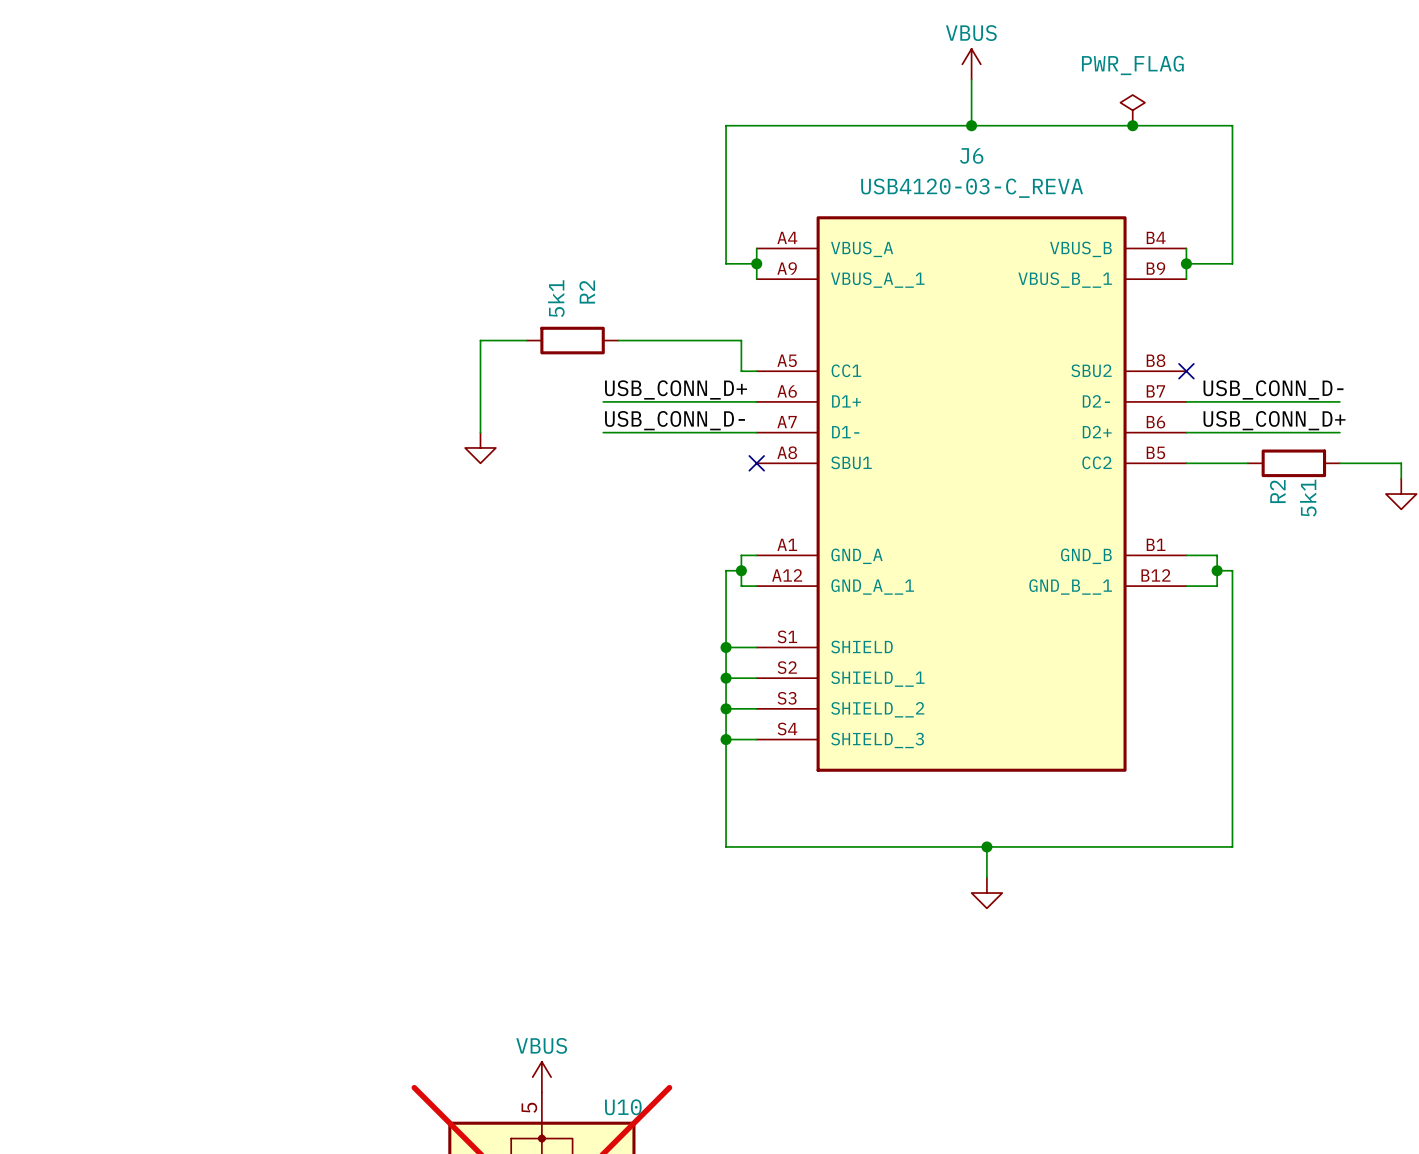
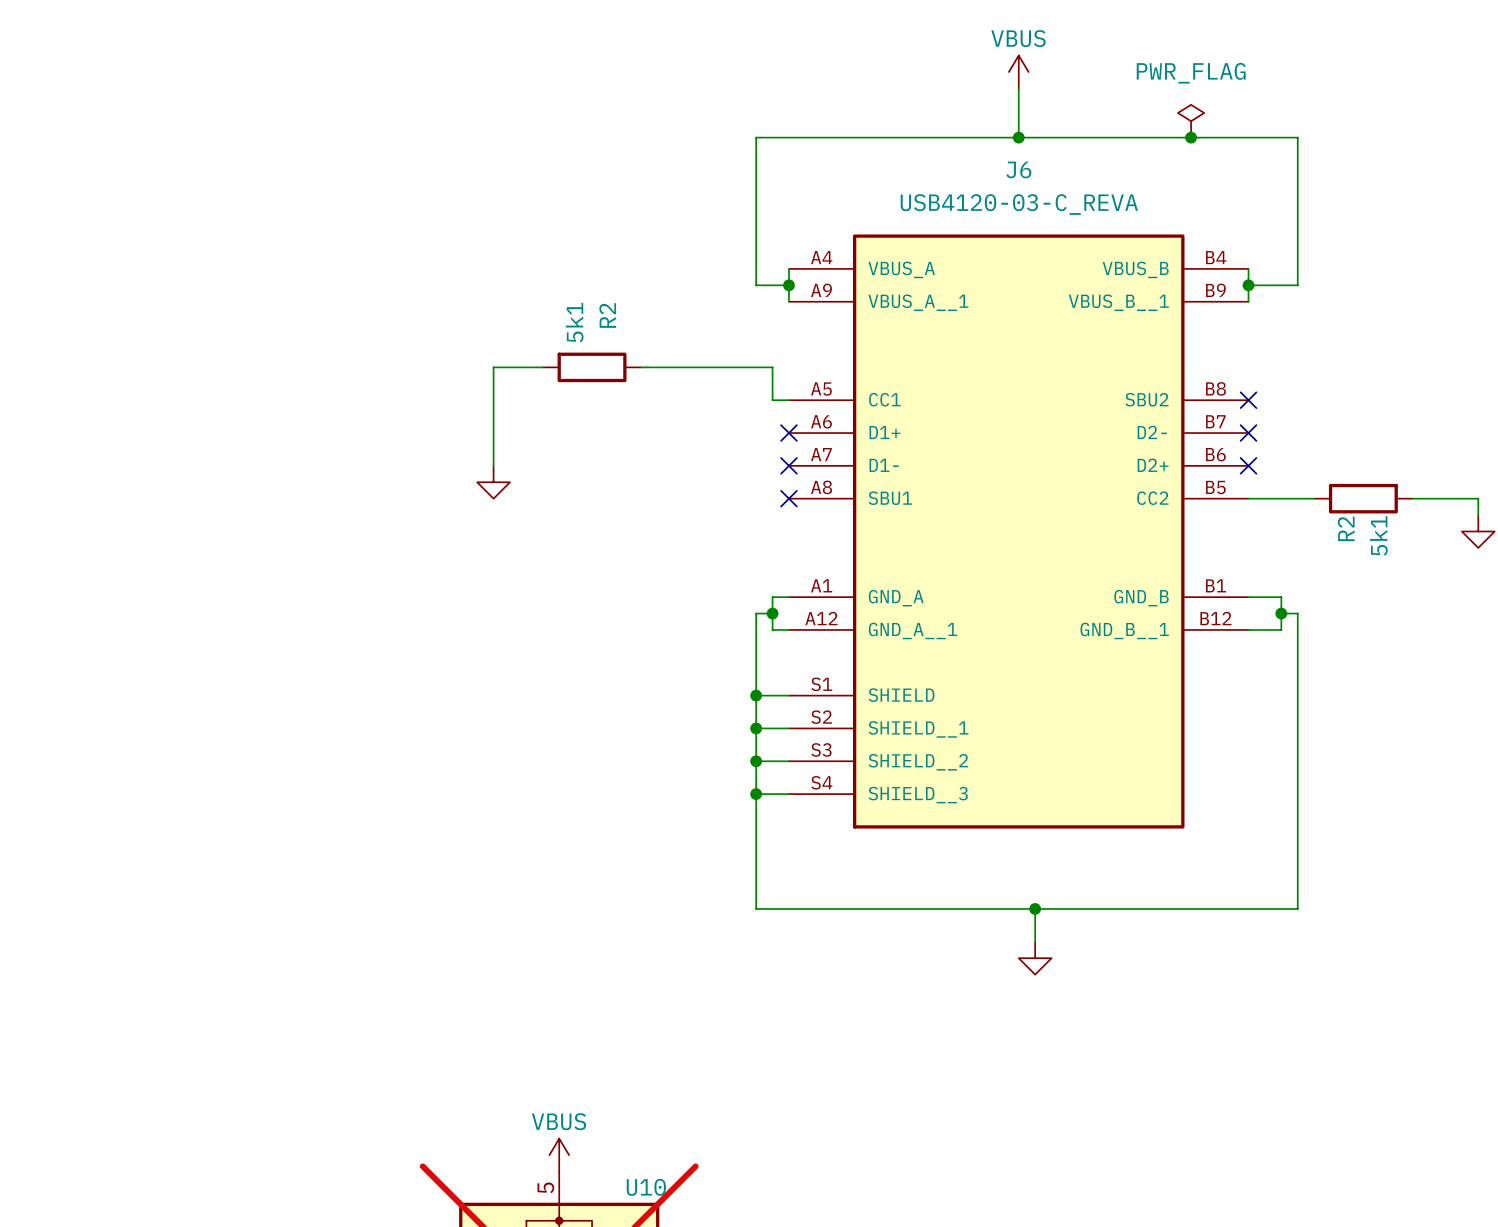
label: USB_CONN_D+ (676, 389) -> none
label: USB_CONN_D- (1273, 389) -> none
wire: (603, 401) (756, 401) -> none
no-connect mark: none -> (788, 433)
wire: (1186, 401) (1339, 401) -> none
no-connect mark: none -> (1248, 433)
label: USB_CONN_D- (675, 420) -> none
label: USB_CONN_D+ (1274, 420) -> none
wire: (603, 432) (756, 432) -> none
no-connect mark: none -> (788, 465)
wire: (1186, 432) (1339, 432) -> none
no-connect mark: none -> (1248, 465)

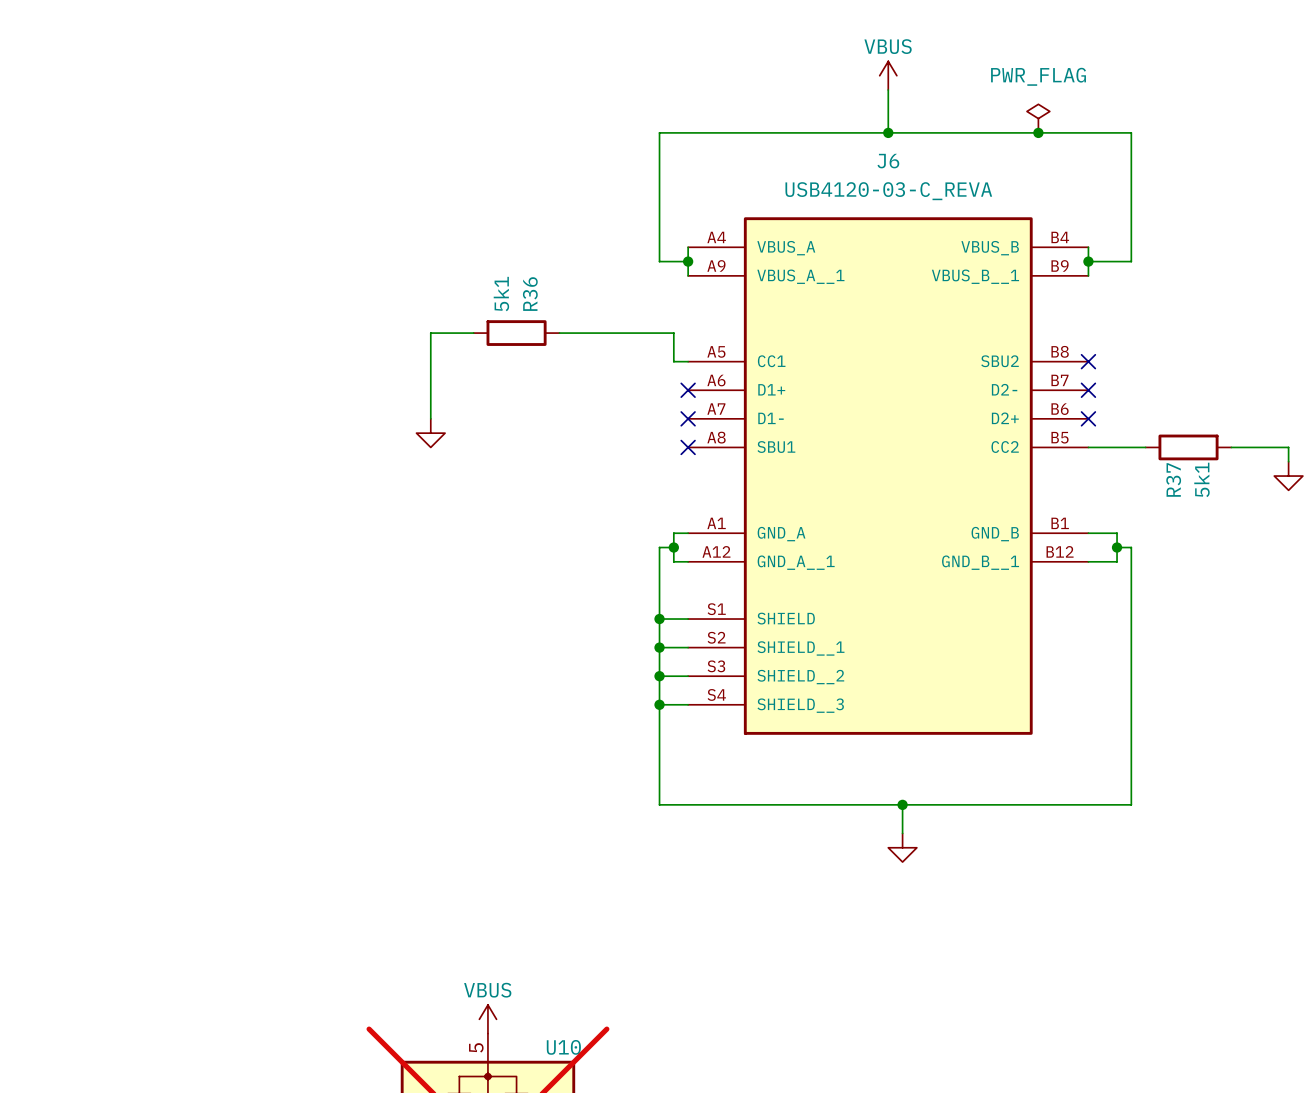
R2 name: R2 (607, 315) -> R36 (530, 294)
R2 name: R2 (1346, 528) -> R37 (1173, 479)

